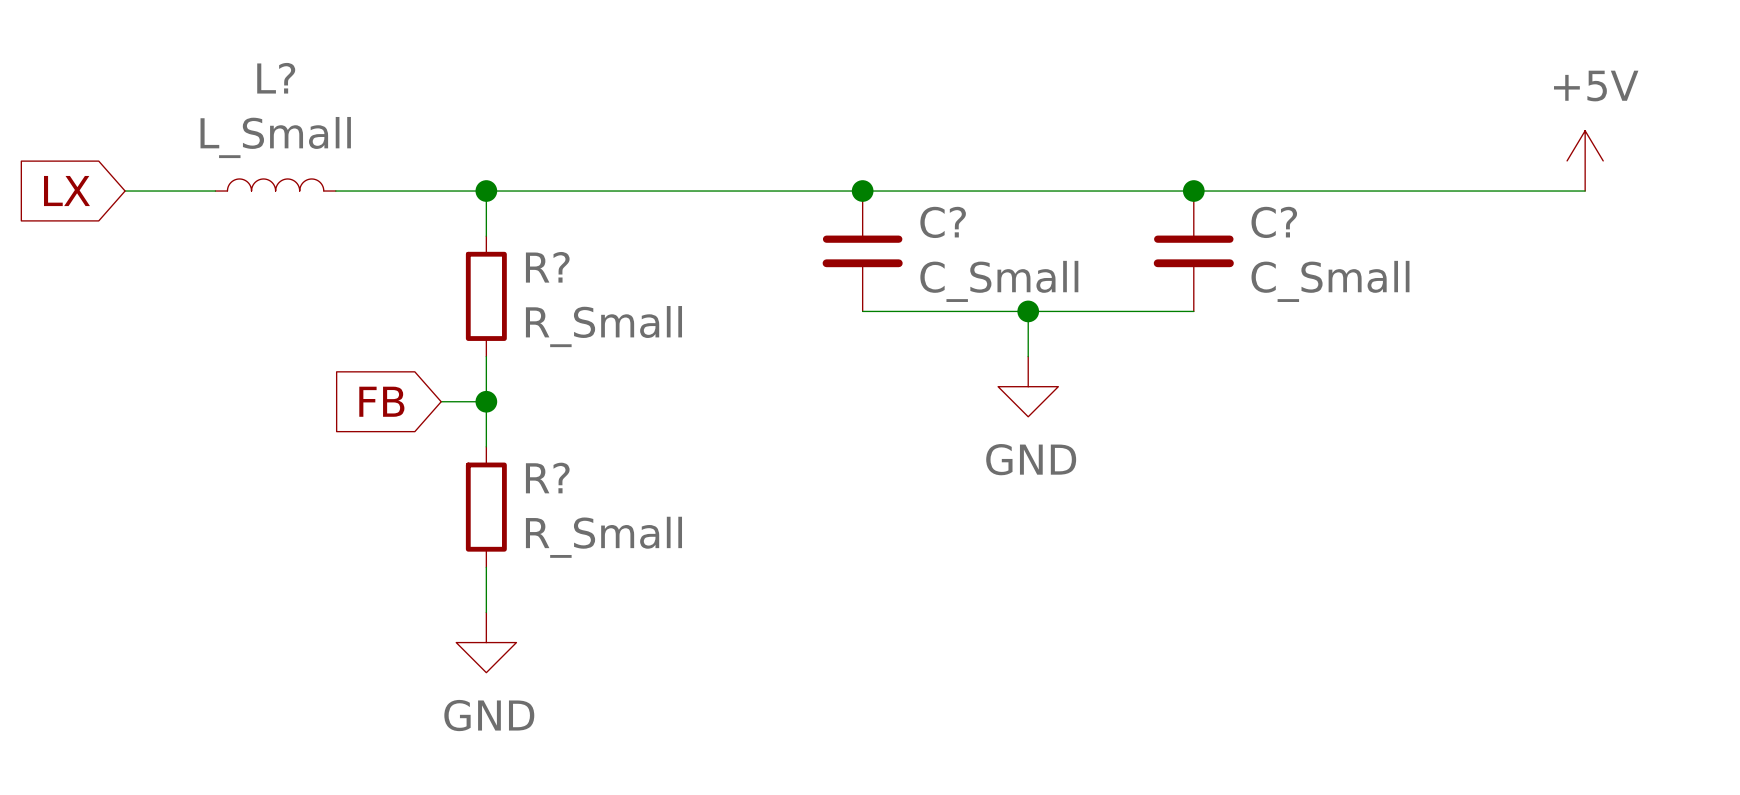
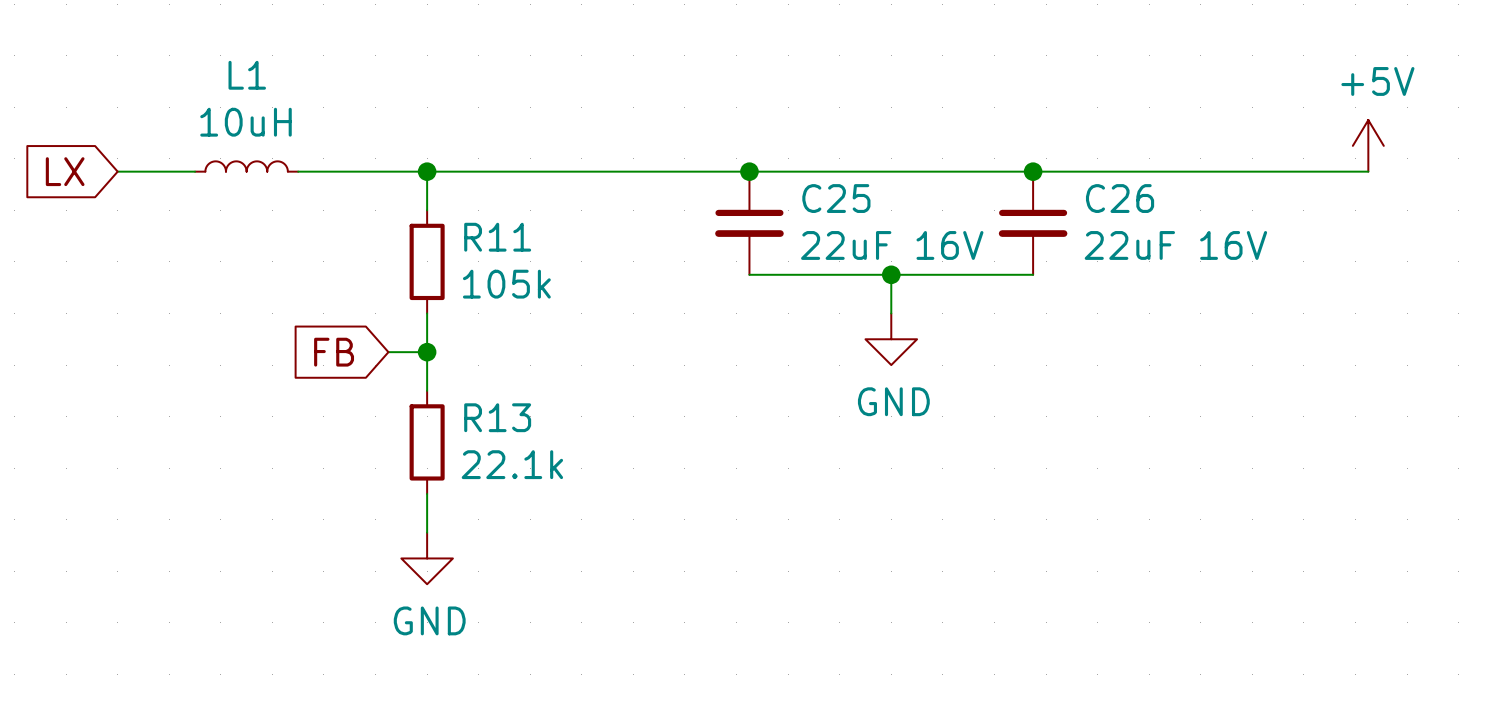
L? name: L? (276, 78) -> L1 (247, 75)
L? value: L_Small (275, 137) -> 10uH (246, 122)
C? name: C? (943, 222) -> C25 (836, 198)
C? name: C? (1274, 222) -> C26 (1120, 198)
R? name: R? (547, 267) -> R11 (497, 237)
C? value: C_Small (999, 281) -> 22uF 16V (892, 245)
C? value: C_Small (1330, 281) -> 22uF 16V (1175, 245)
R? value: R_Small (603, 326) -> 105k (506, 284)
R? name: R? (547, 478) -> R13 (497, 417)
R? value: R_Small (603, 537) -> 22.1k (512, 464)

